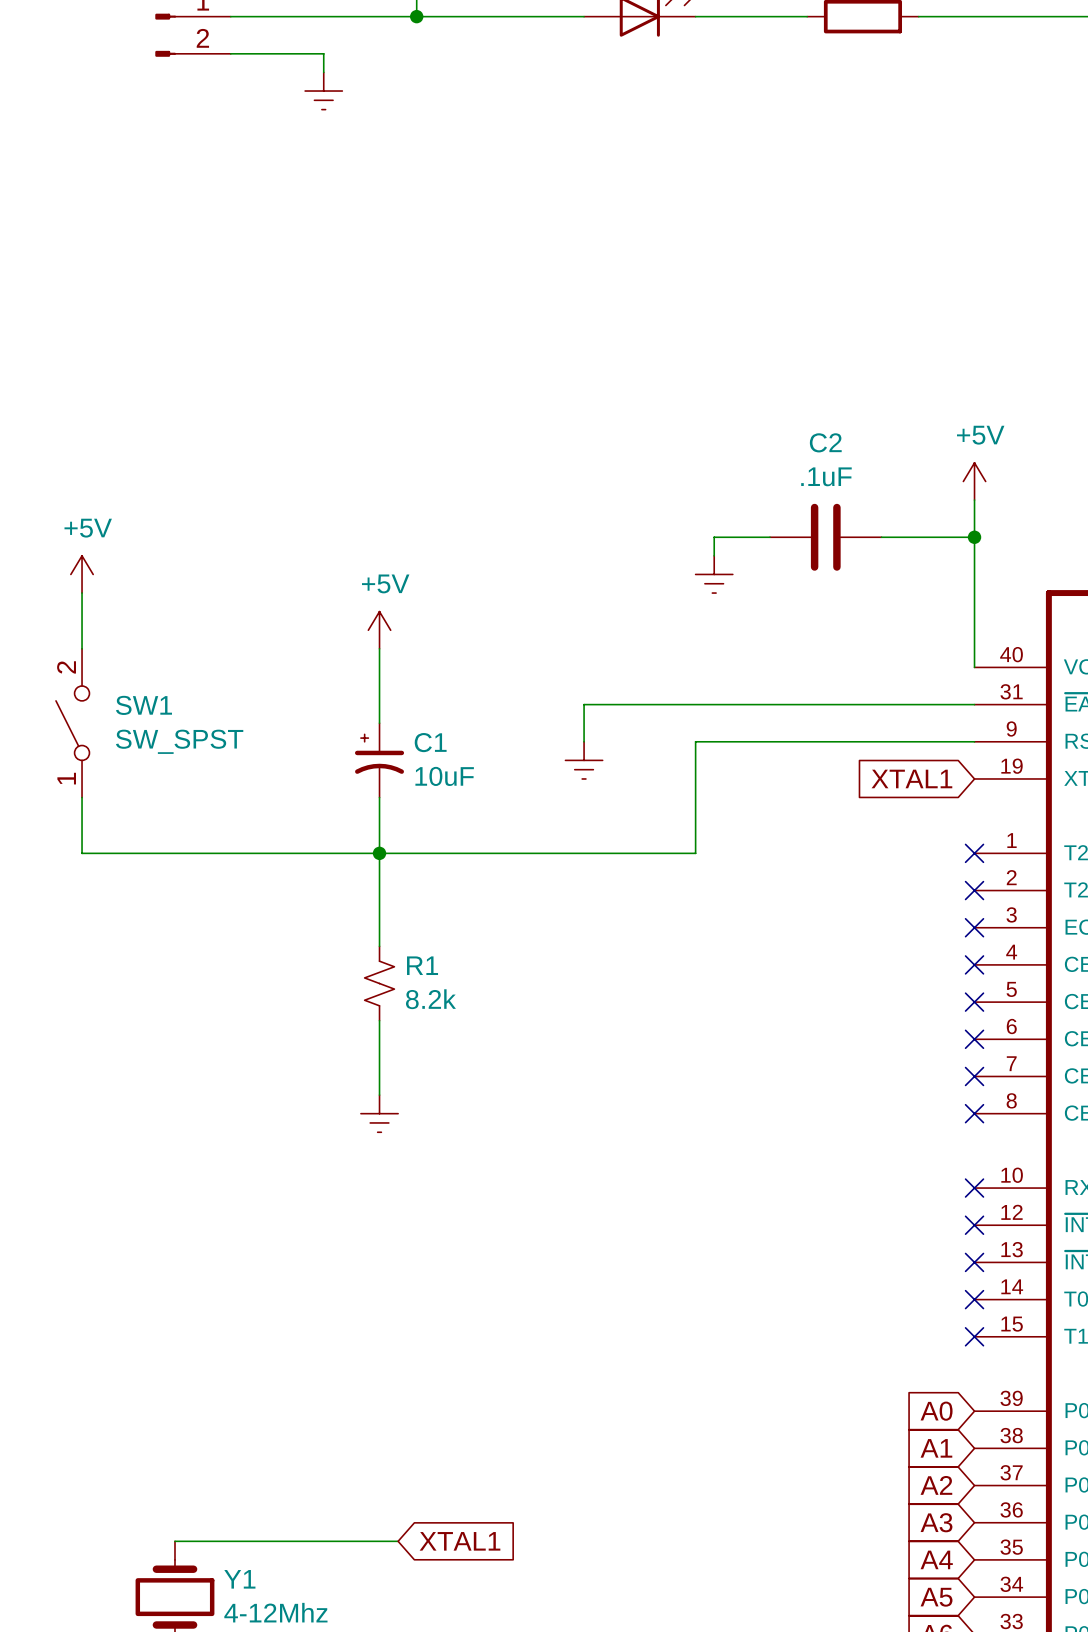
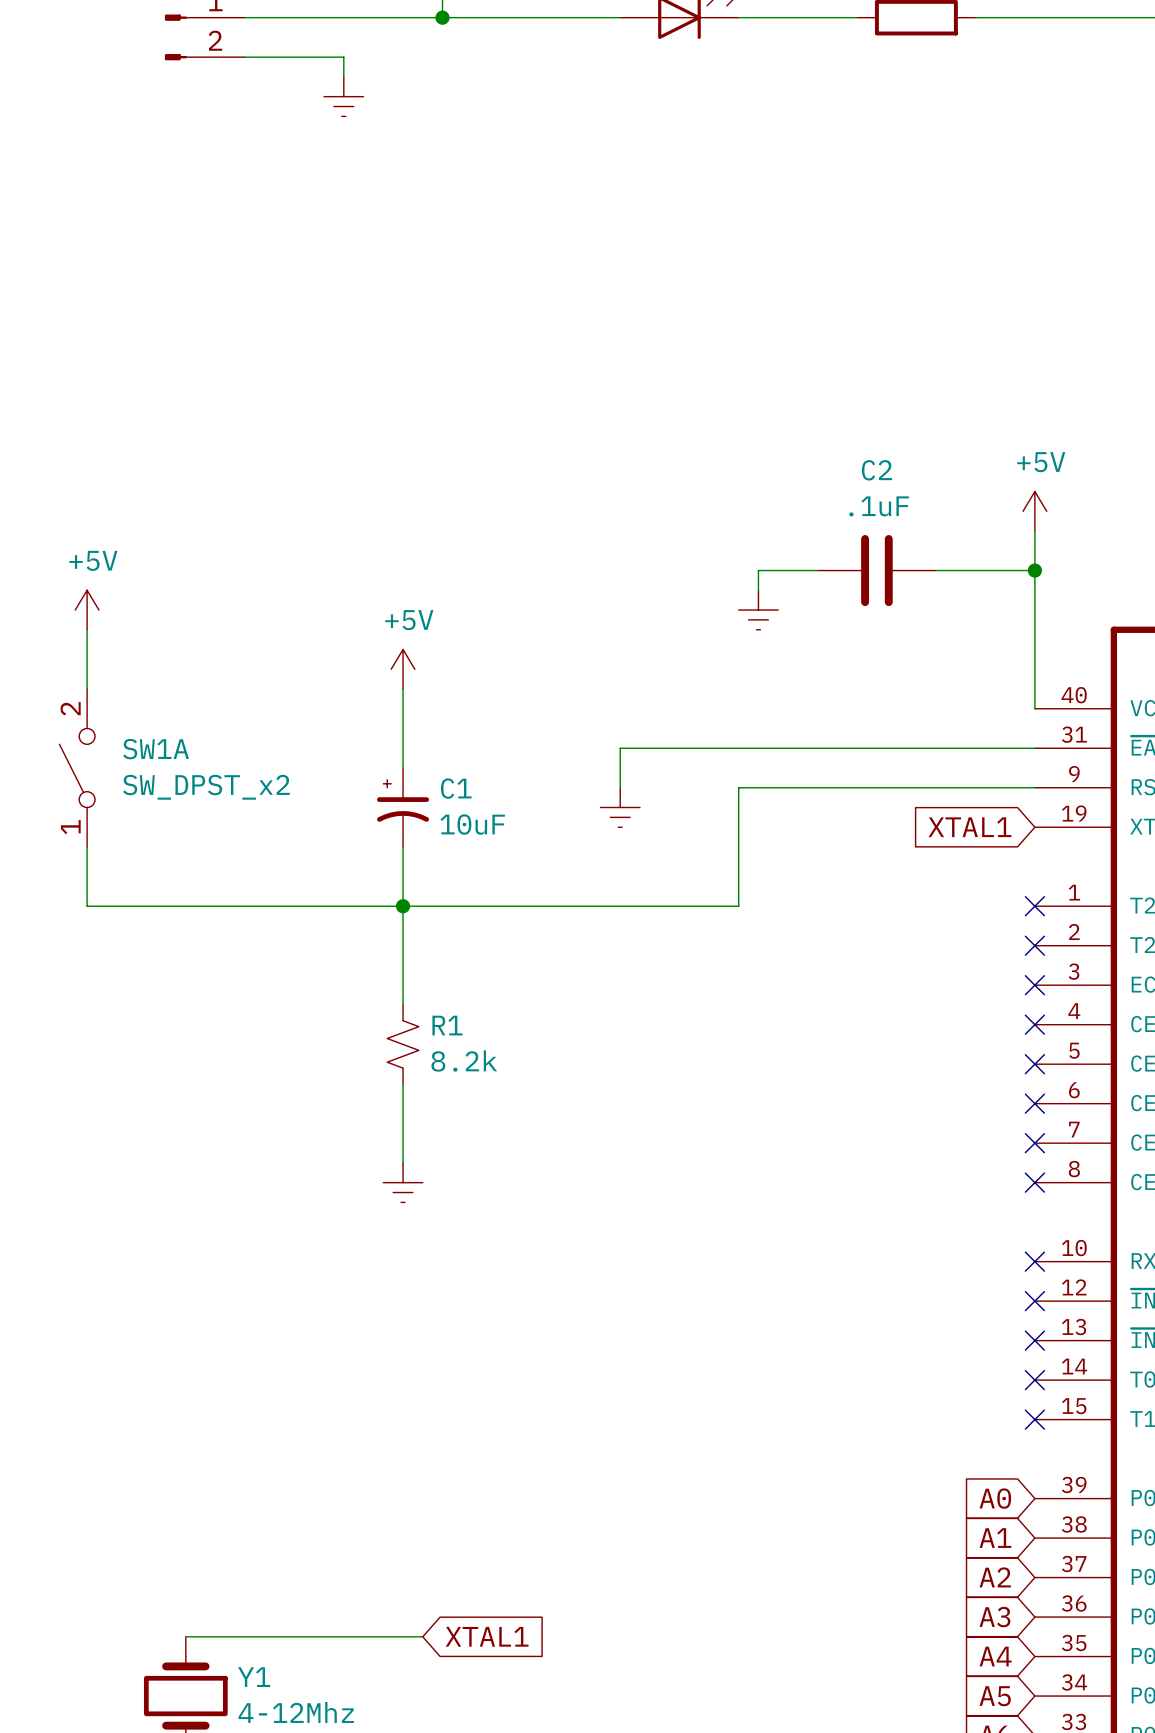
SW1 name: SW1 (143, 705) -> SW1A (156, 749)
SW1 value: SW_SPST (179, 741) -> SW_DPST_x2 (206, 787)

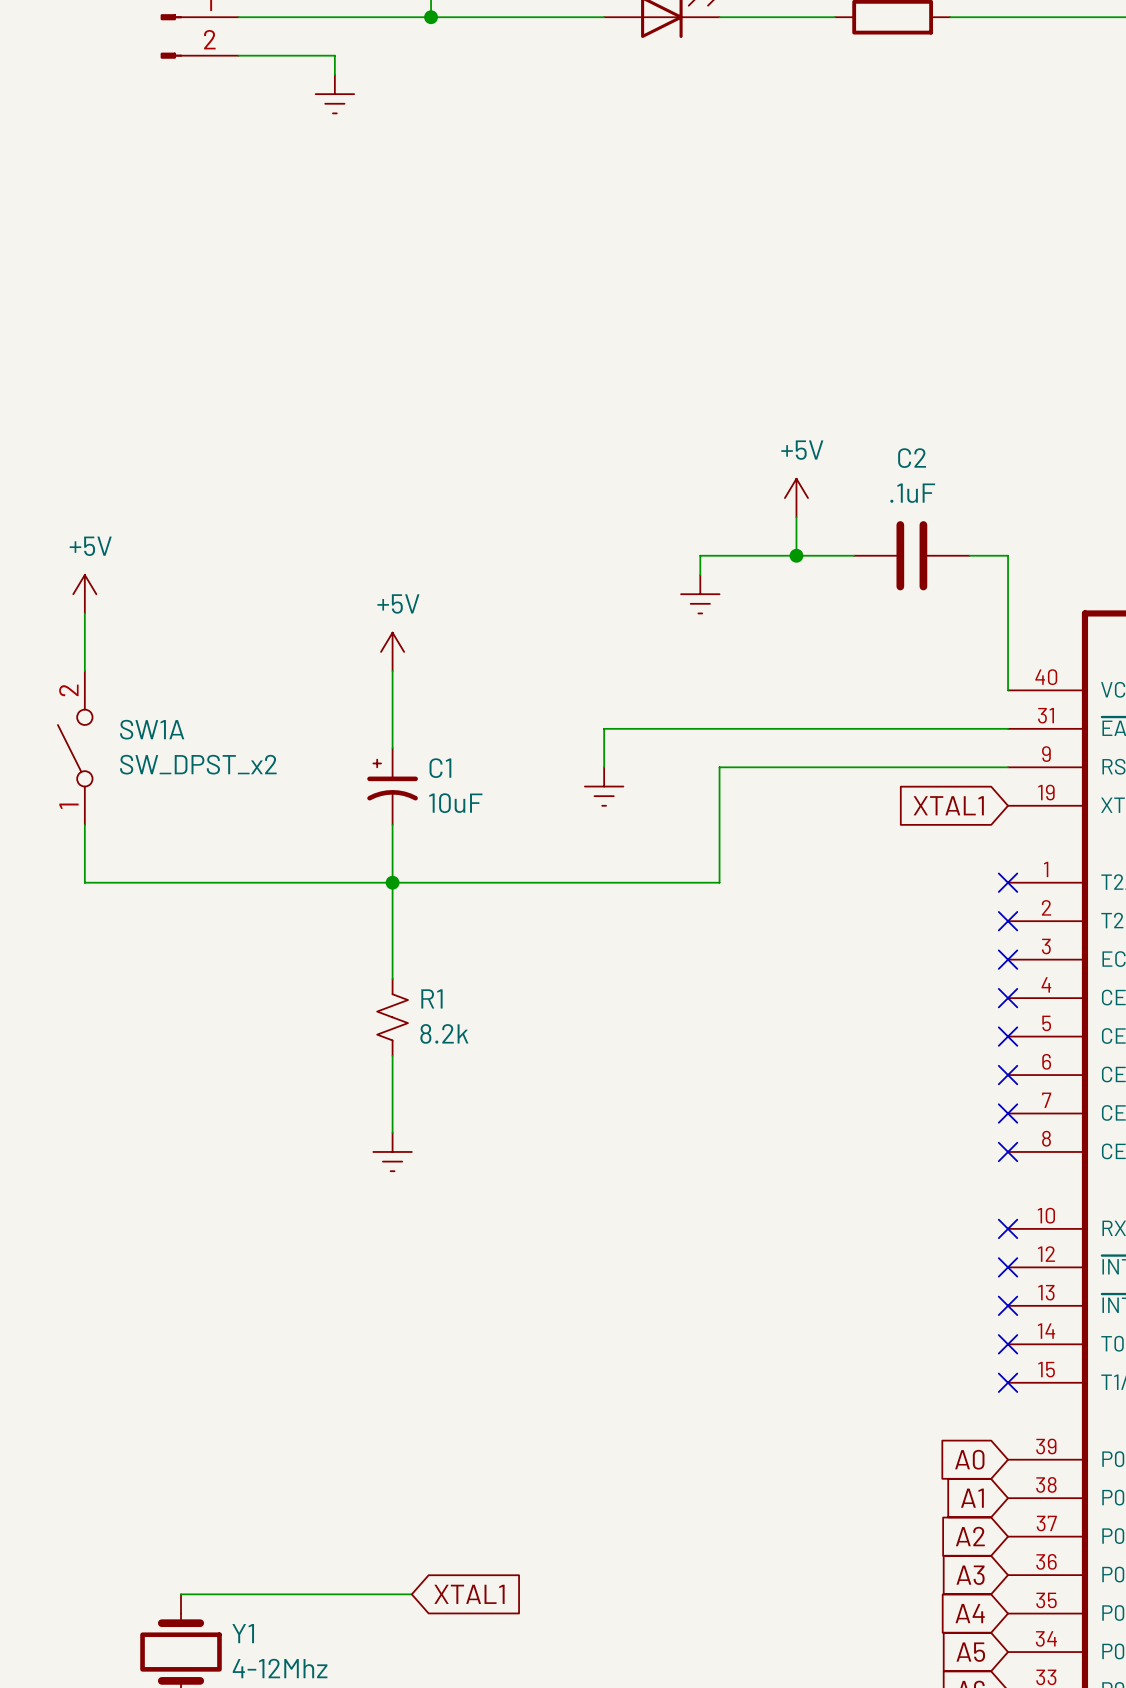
power symbol position: +5V (1034, 511) -> +5V (796, 498)
wire: none -> (796, 517) (796, 555) (854, 555)
wire: (1034, 531) (1034, 570) -> none
wire: (758, 570) (758, 590) -> (738, 555) (700, 555) (700, 574)
junction: none -> (796, 555)
C2 position: (876, 570) -> (911, 555)
junction: (1034, 570) -> none
power symbol position: (758, 610) -> (700, 594)

